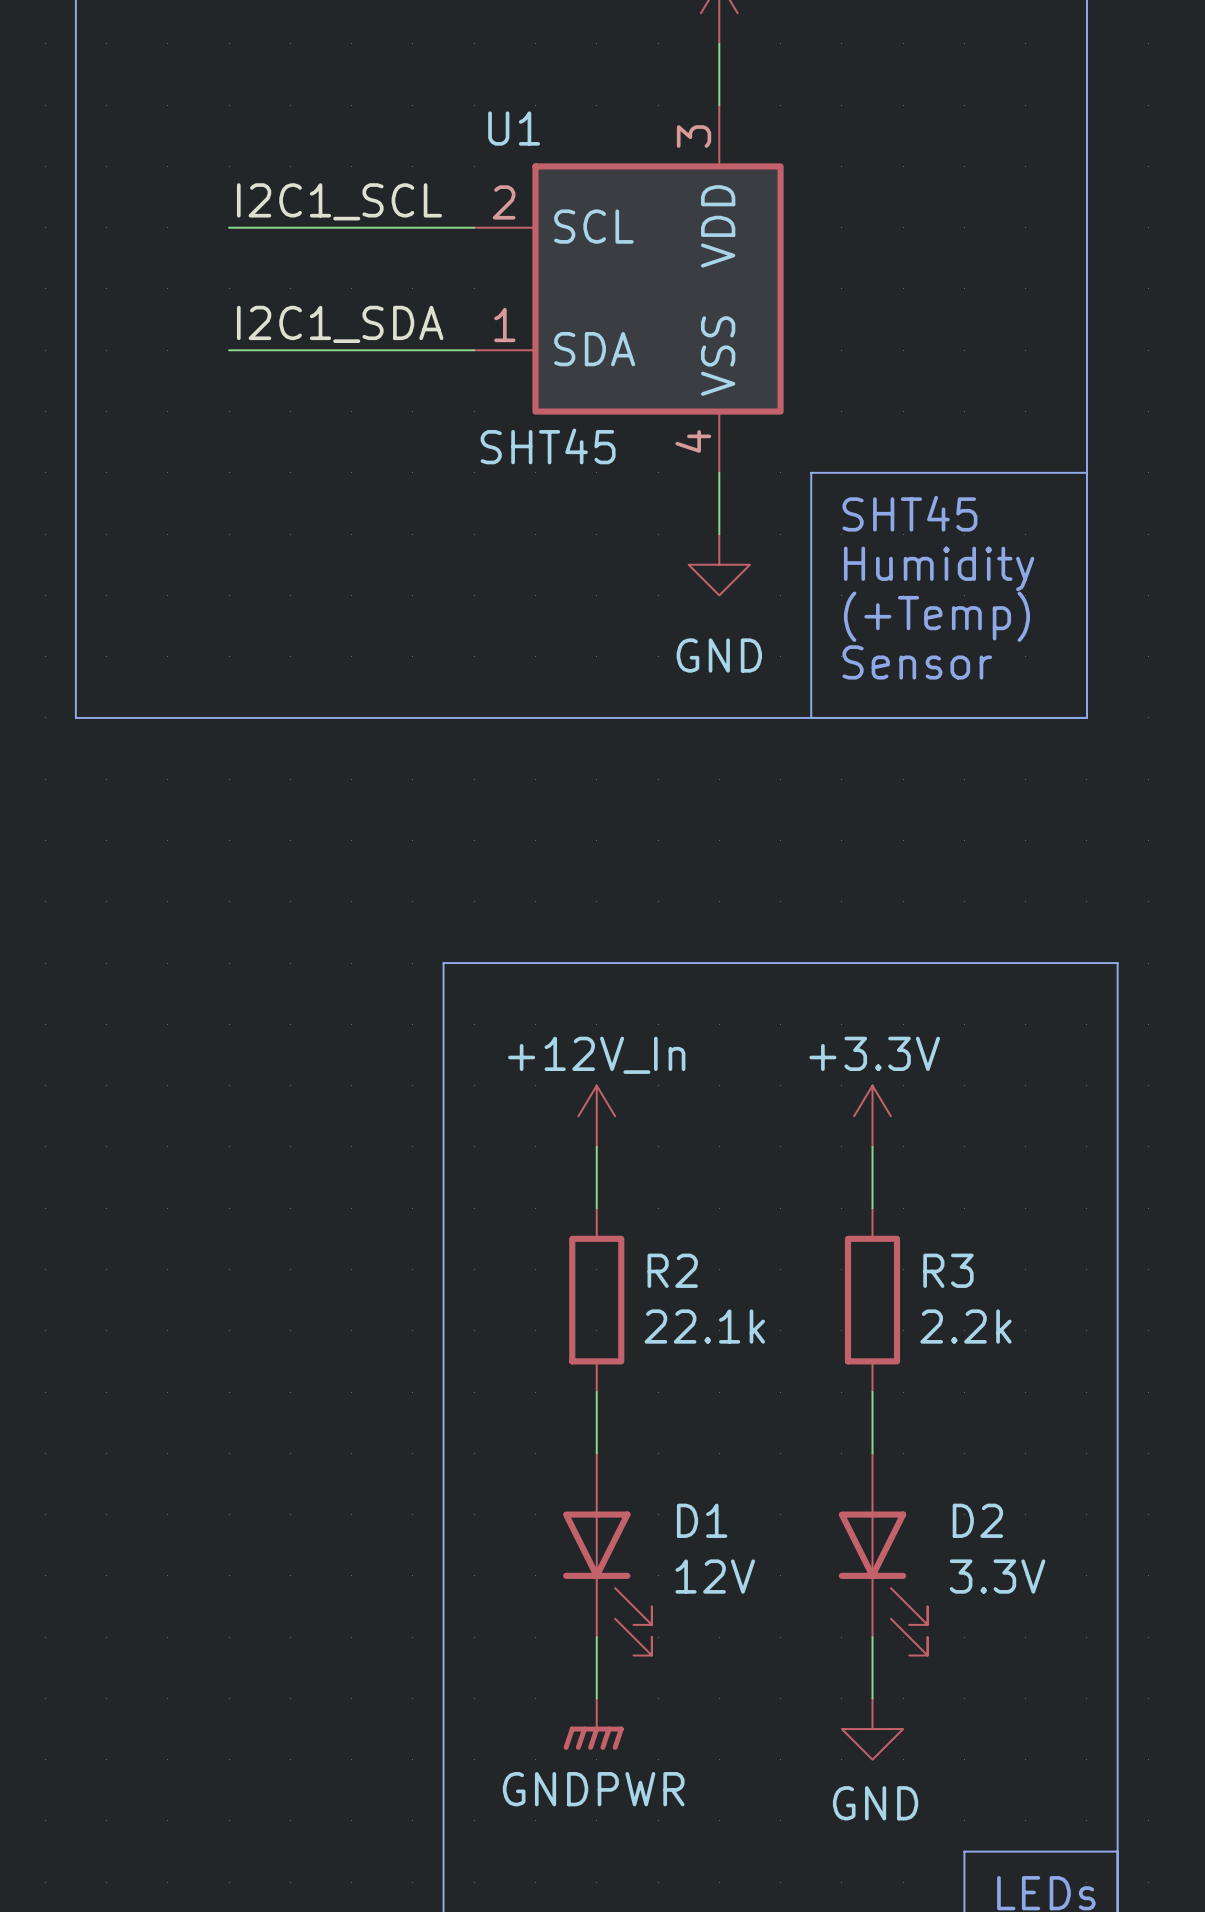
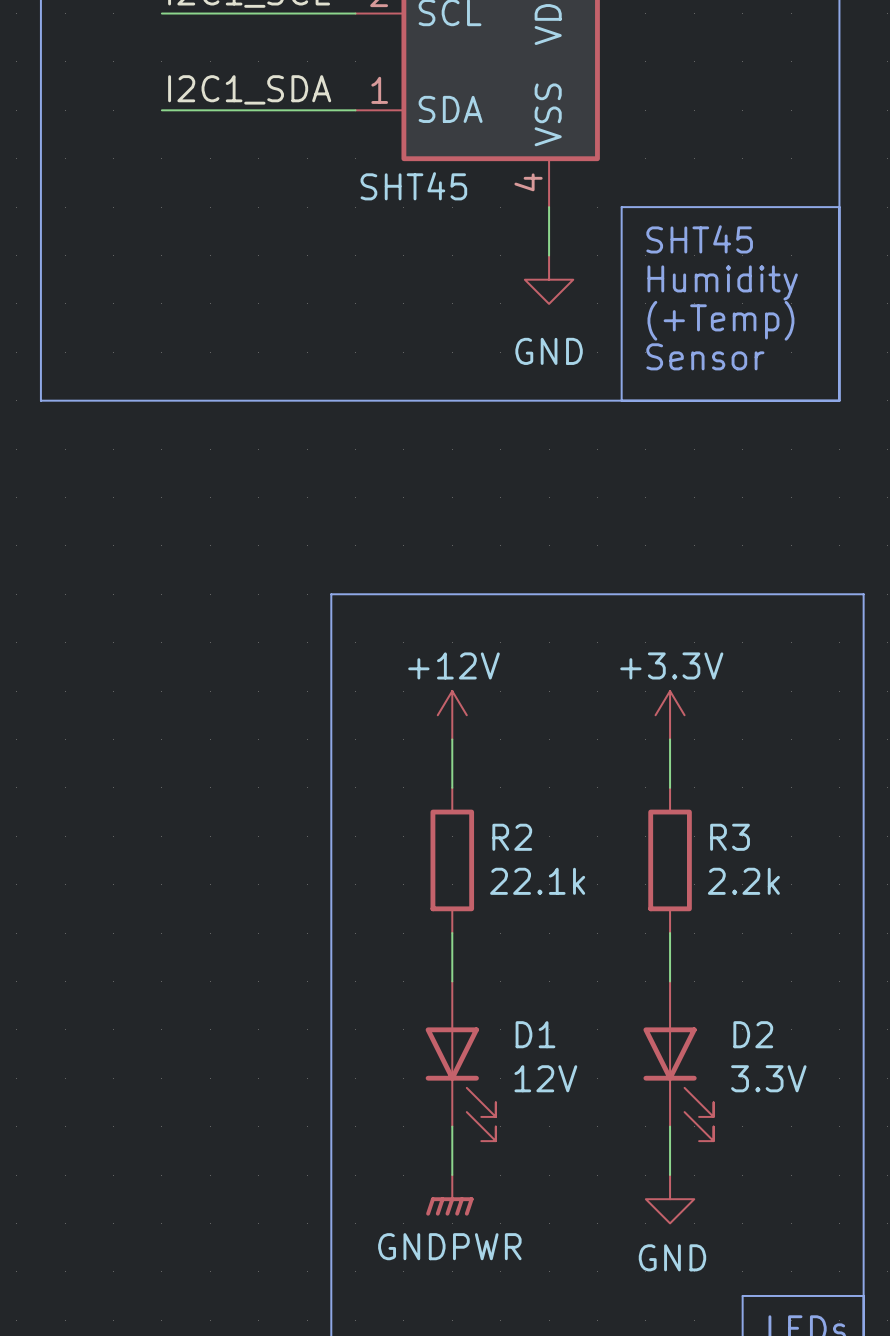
power symbol: +12V_In (596, 1116) -> +12V (452, 715)

